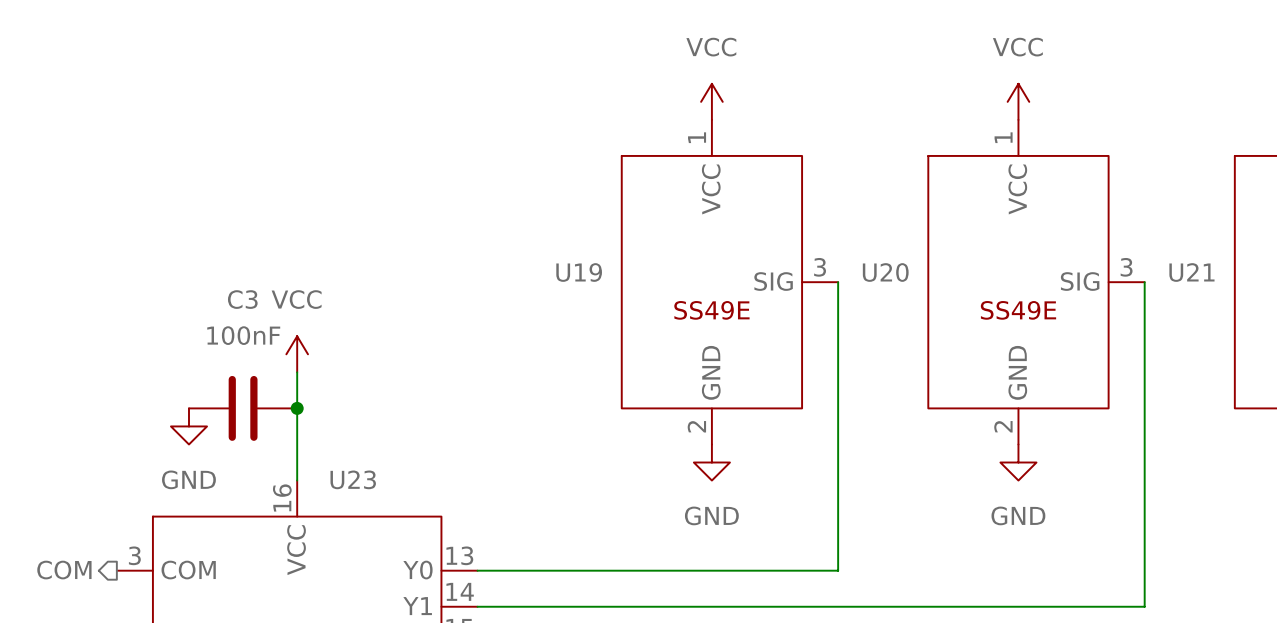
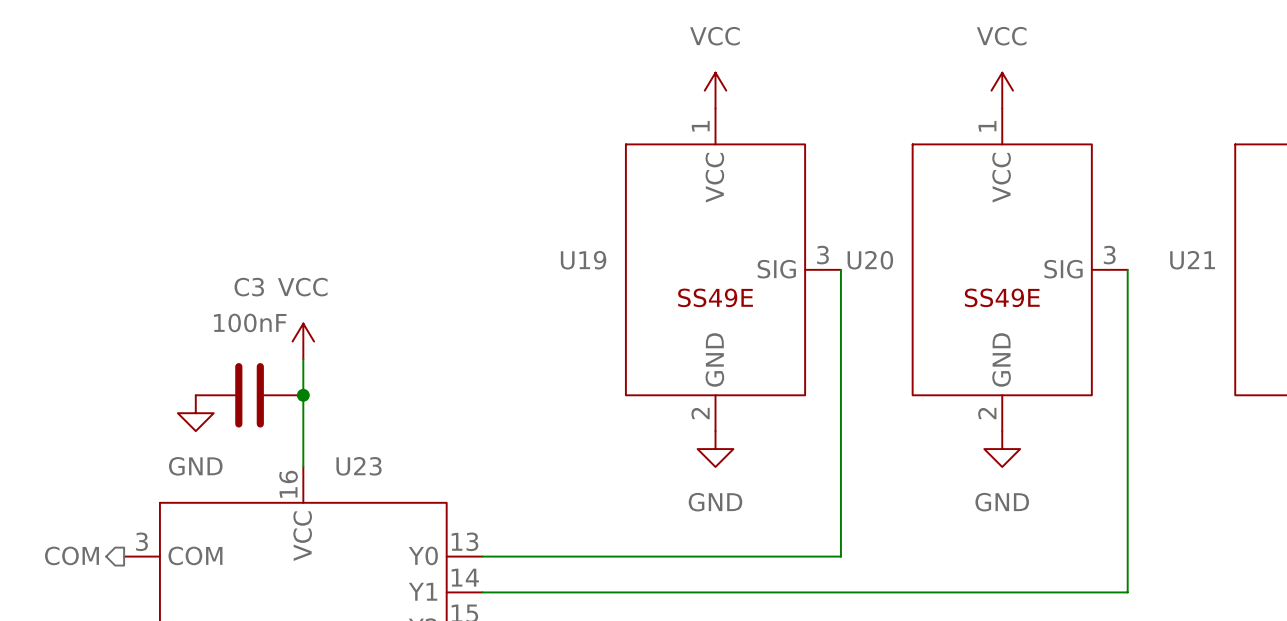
power symbol position: VCC (1018, 101) -> VCC (1002, 90)
U20 position: (1036, 282) -> (1020, 269)
wire: (1144, 282) (1144, 606) (1126, 606) -> (1127, 269) (1127, 592)
power symbol position: GND (1018, 462) -> GND (1002, 449)

